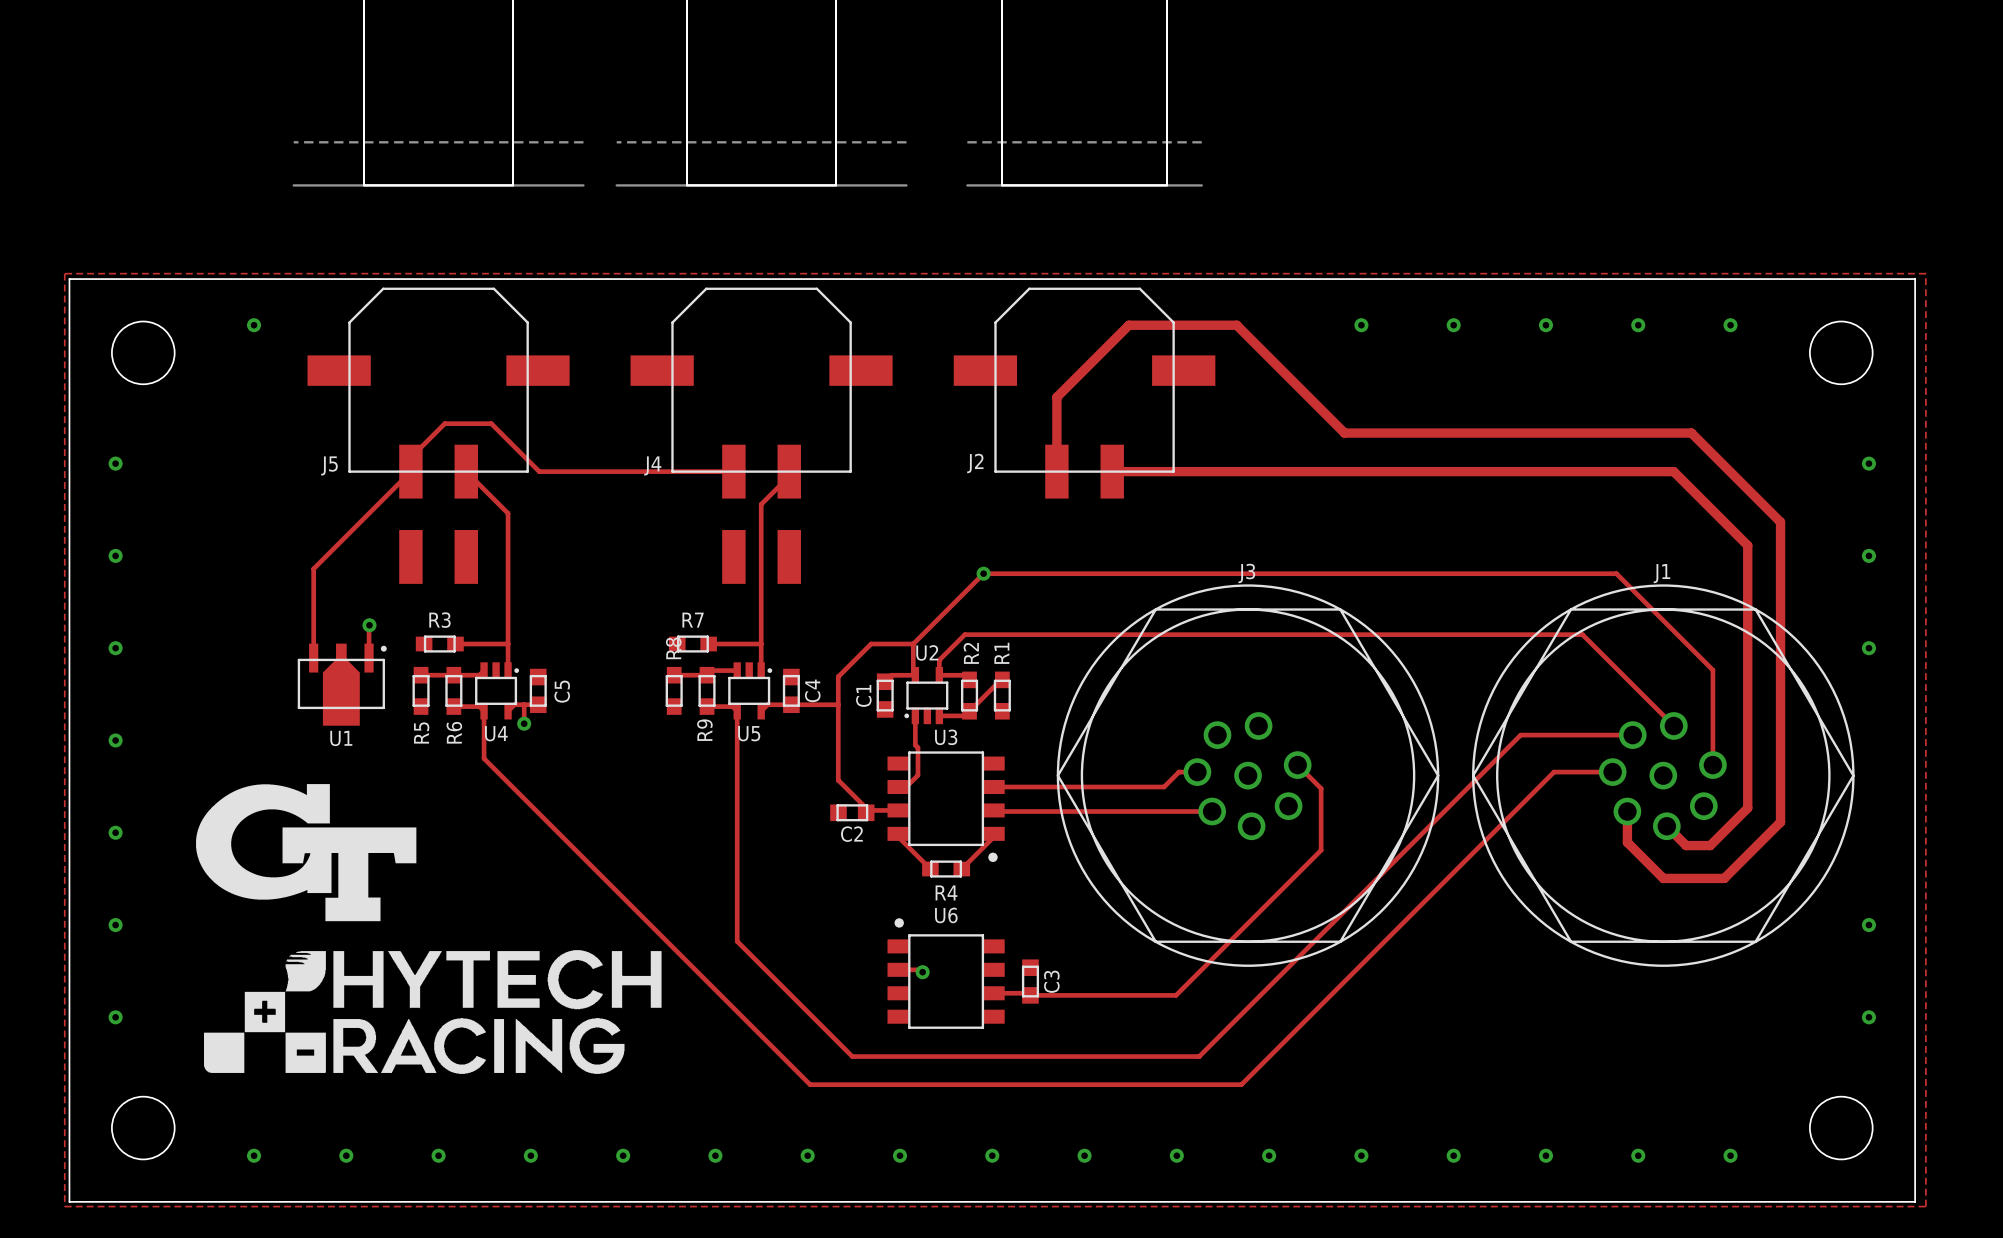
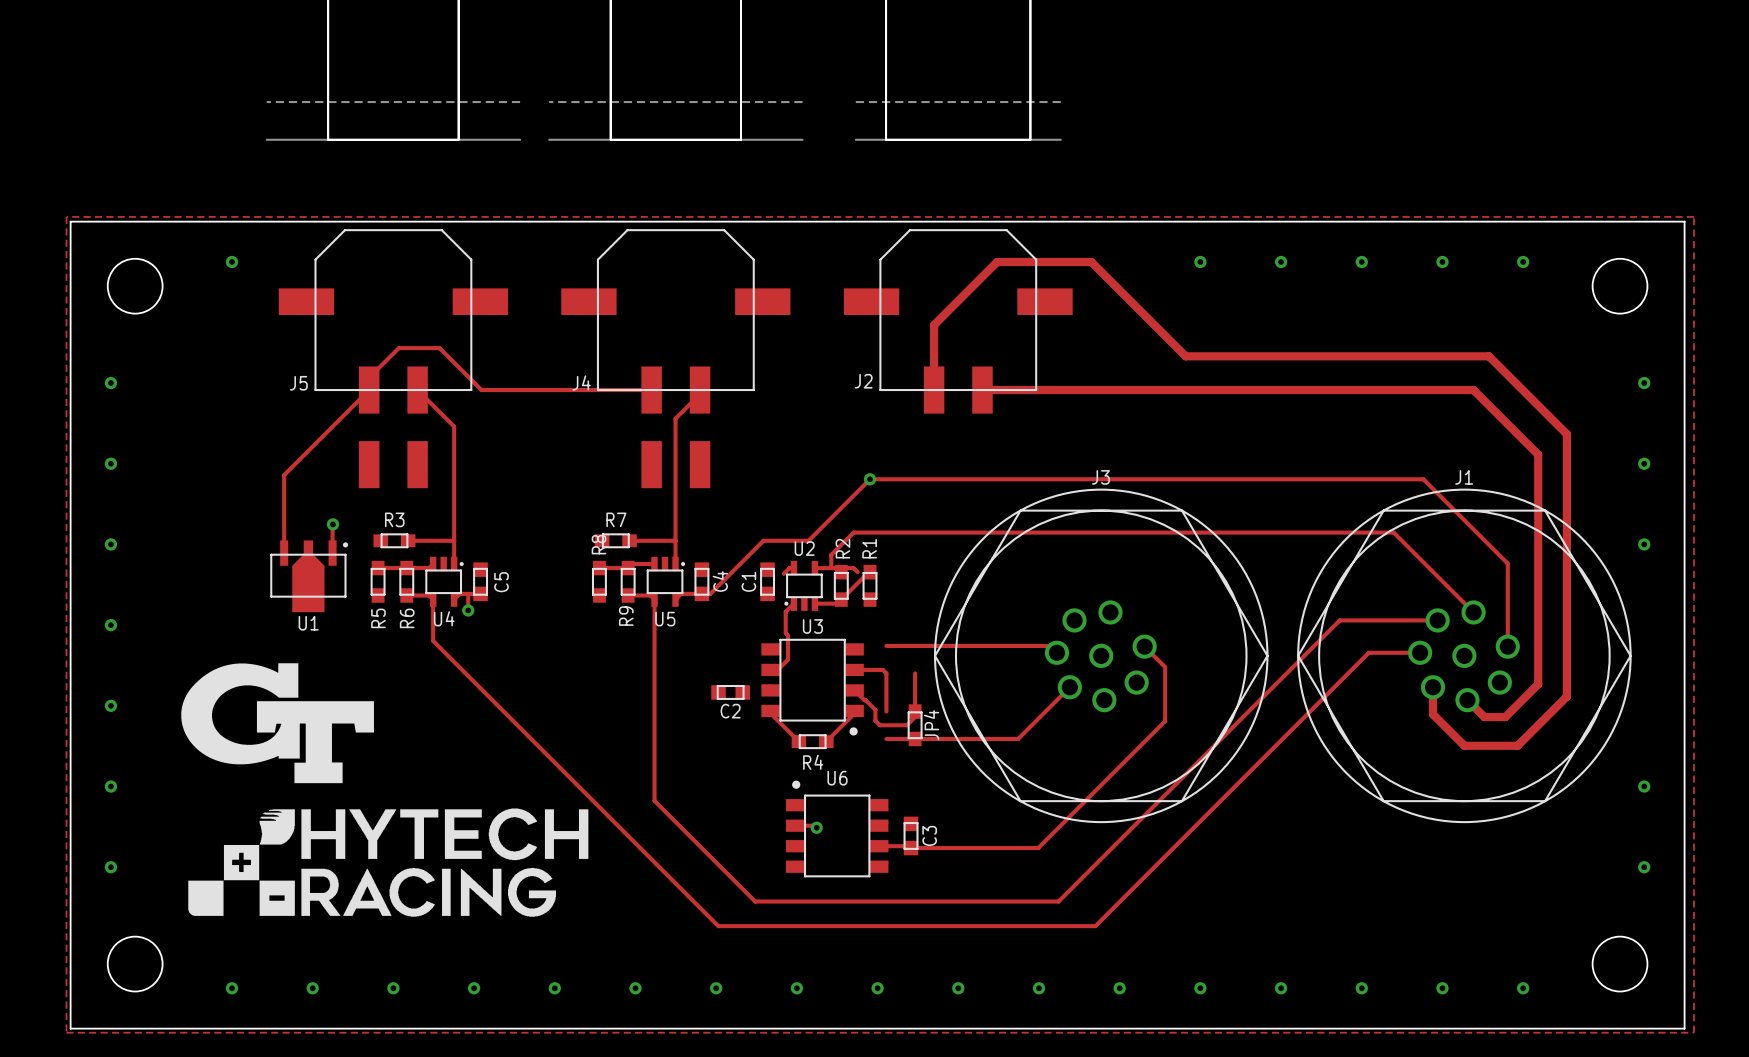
track: (871, 644) (838, 676) (838, 780) (868, 810) (898, 810) -> none
track: (913, 644) (913, 673) (915, 675) (896, 675) -> none
track: none -> (814, 568) (831, 568)
track: (1002, 679) (964, 715) (946, 715) -> (870, 572) (837, 603)
C1 position: (885, 695) -> (767, 581)
U2 position: (926, 695) -> (803, 585)
R2 position: (969, 695) -> (841, 585)
R1 position: (1002, 695) -> (870, 585)
track: (791, 704) (838, 704) -> (702, 594) (710, 594) (763, 540) (771, 540)
track: none -> (793, 603) (785, 611) (788, 659) (777, 669) (770, 669)
track: (915, 715) (917, 775) (906, 786) (898, 786) -> none
track: none -> (814, 603) (831, 603)
track: (1197, 772) (1179, 772) (1164, 786) (994, 786) -> (1056, 652) (1050, 645) (886, 645)
track: none -> (854, 669) (882, 669) (886, 673) (886, 711)
track: none -> (915, 673) (915, 717) (906, 725) (880, 725) (875, 720) (875, 709) (854, 690)
U3 position: (946, 806) -> (812, 687)
track: (994, 810) (1212, 811) -> (886, 738) (1018, 738) (1069, 687)
C2 position: (852, 812) -> (730, 692)
track: (898, 833) (898, 836) (930, 869) -> (770, 710) (770, 713) (798, 741)
track: (994, 833) (994, 836) (961, 869) -> (854, 710) (854, 713) (826, 741)
JP4: none -> (915, 725)
R4 position: (946, 869) -> (812, 741)

